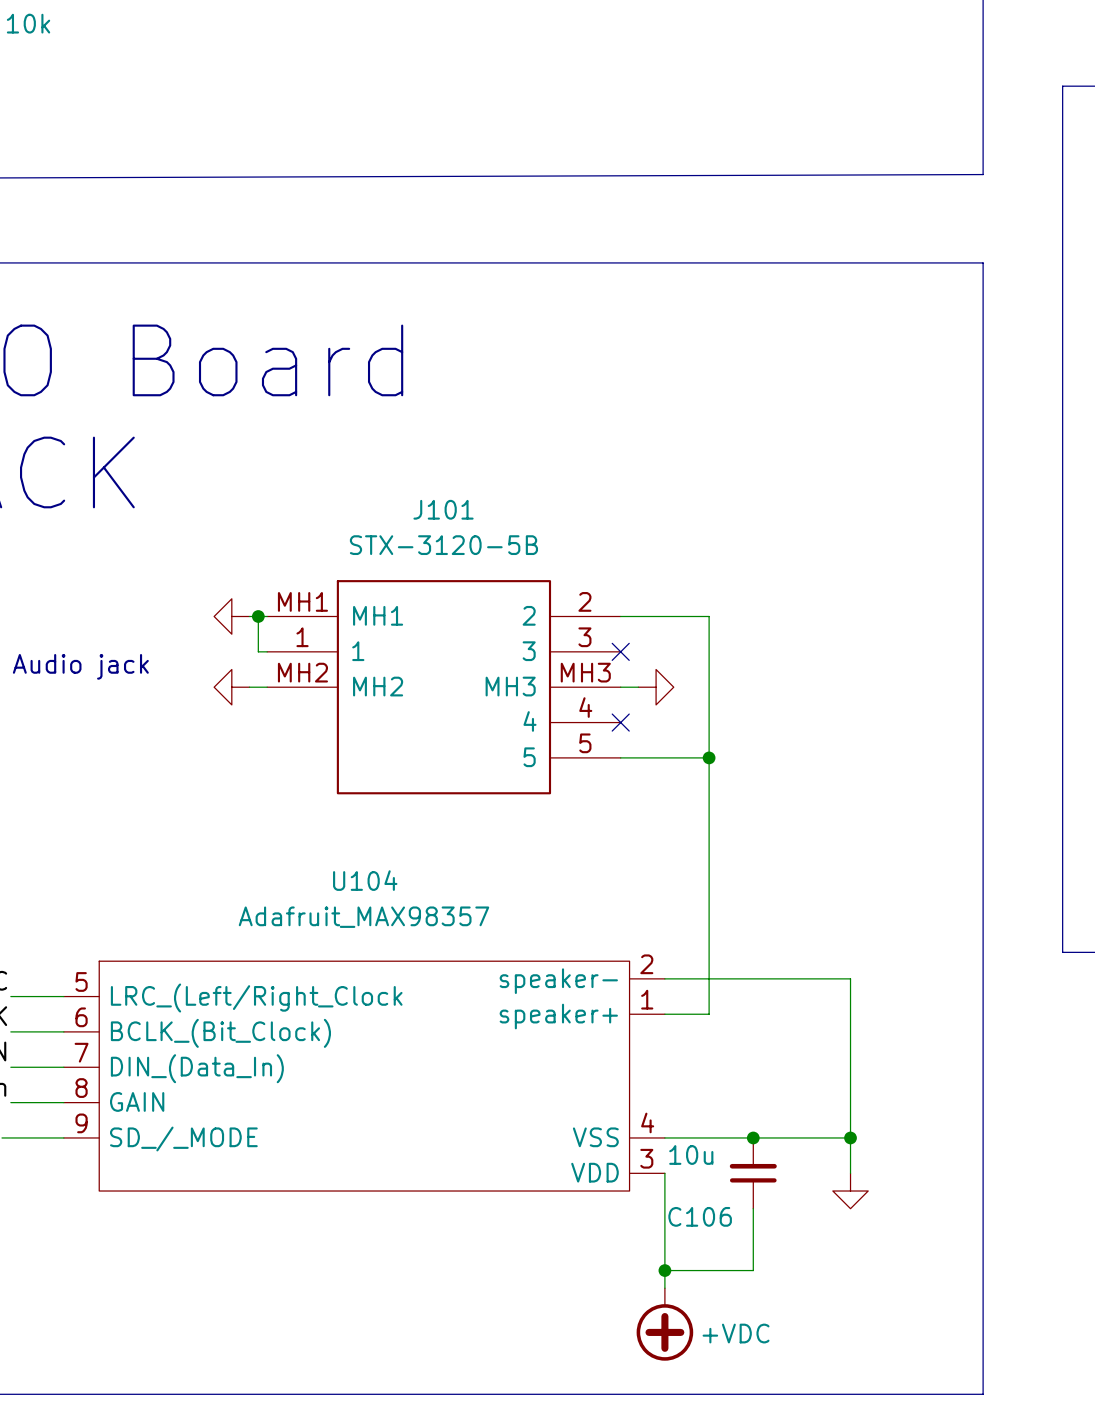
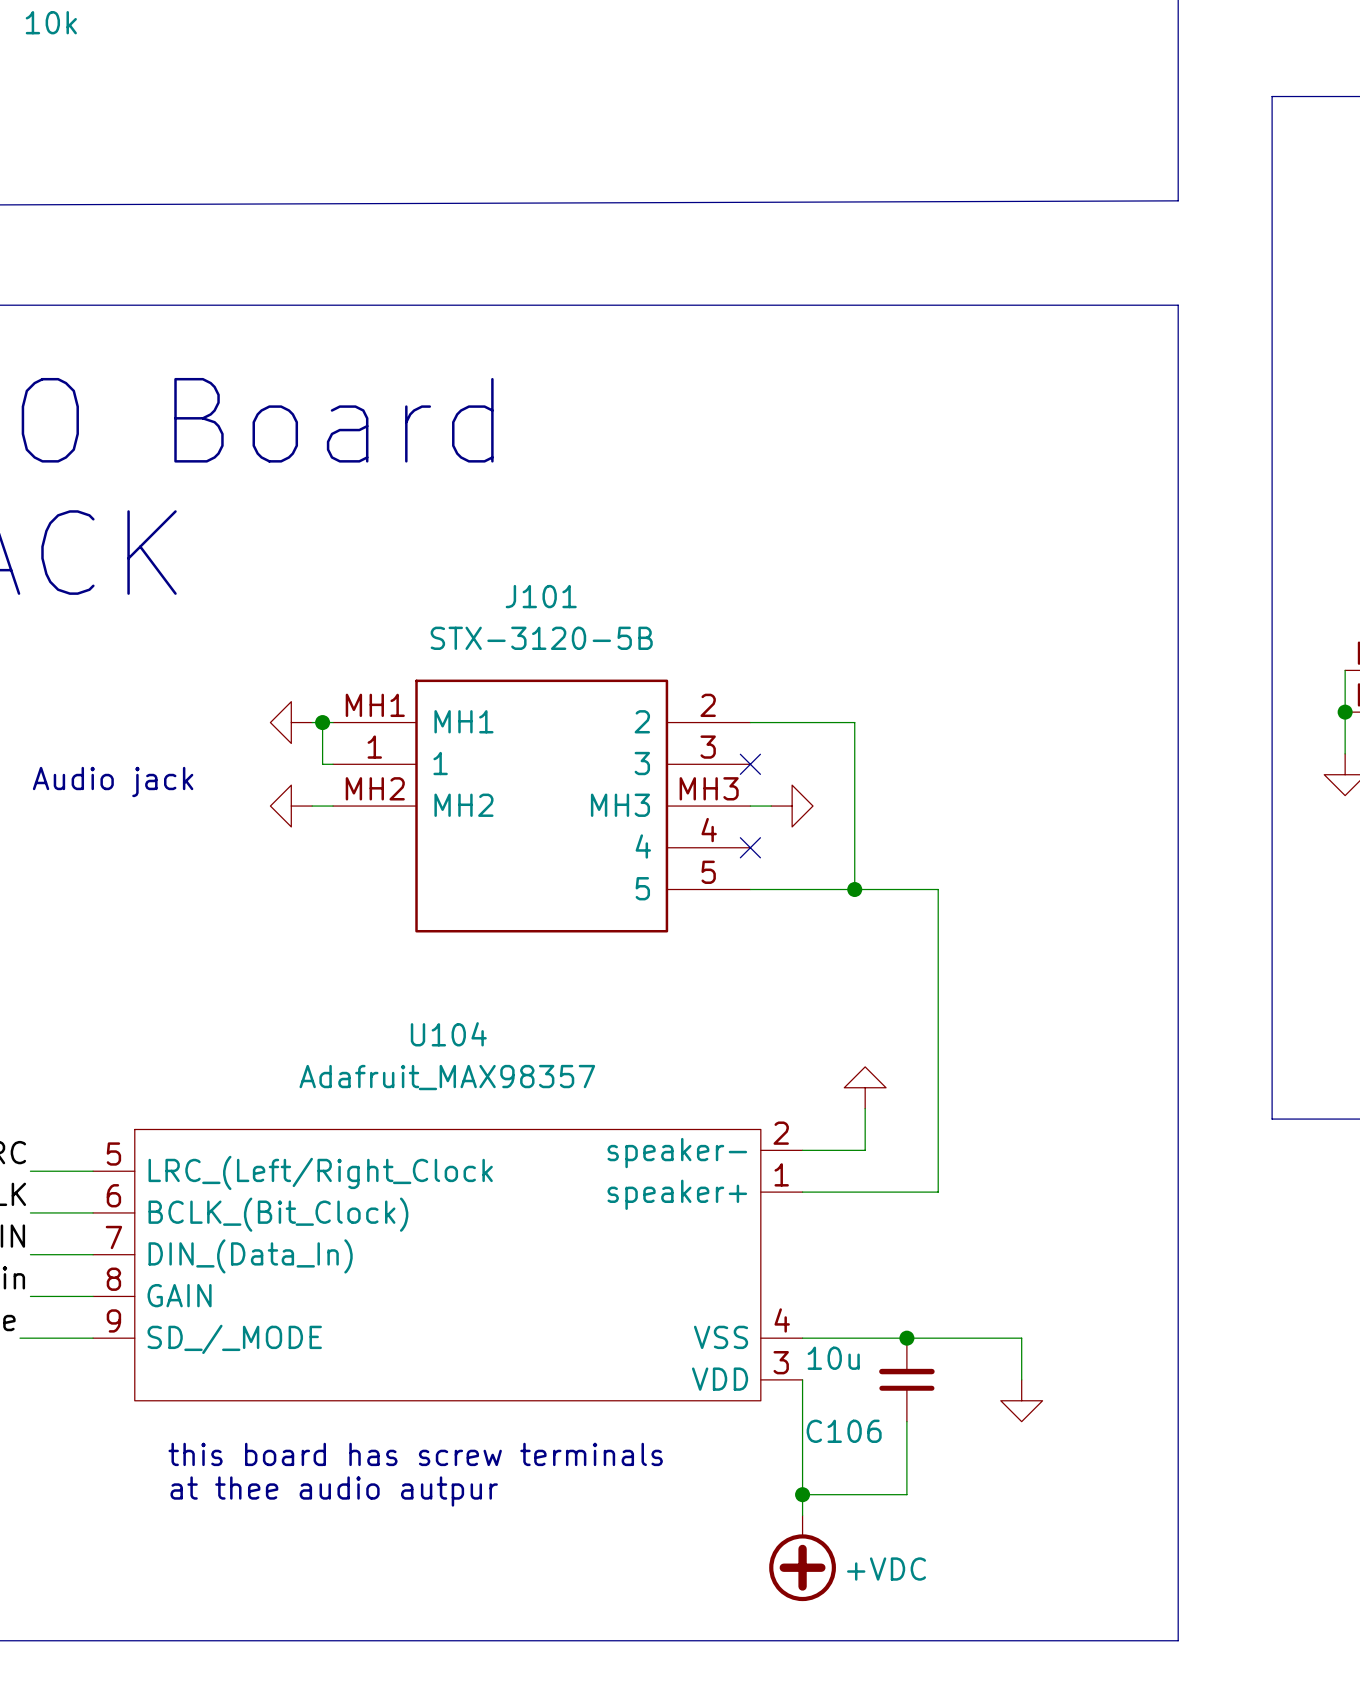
wire: (709, 757) (709, 1014) -> (854, 889) (938, 889) (938, 1192) (854, 1192)
power symbol: none -> (865, 1087)
wire: (717, 978) (850, 978) (850, 1137) -> (865, 1150) (865, 1108)
junction: (850, 1137) -> none
text: none -> this board has screw terminals (415, 1454)
text: none -> at thee audio autpur (334, 1491)

